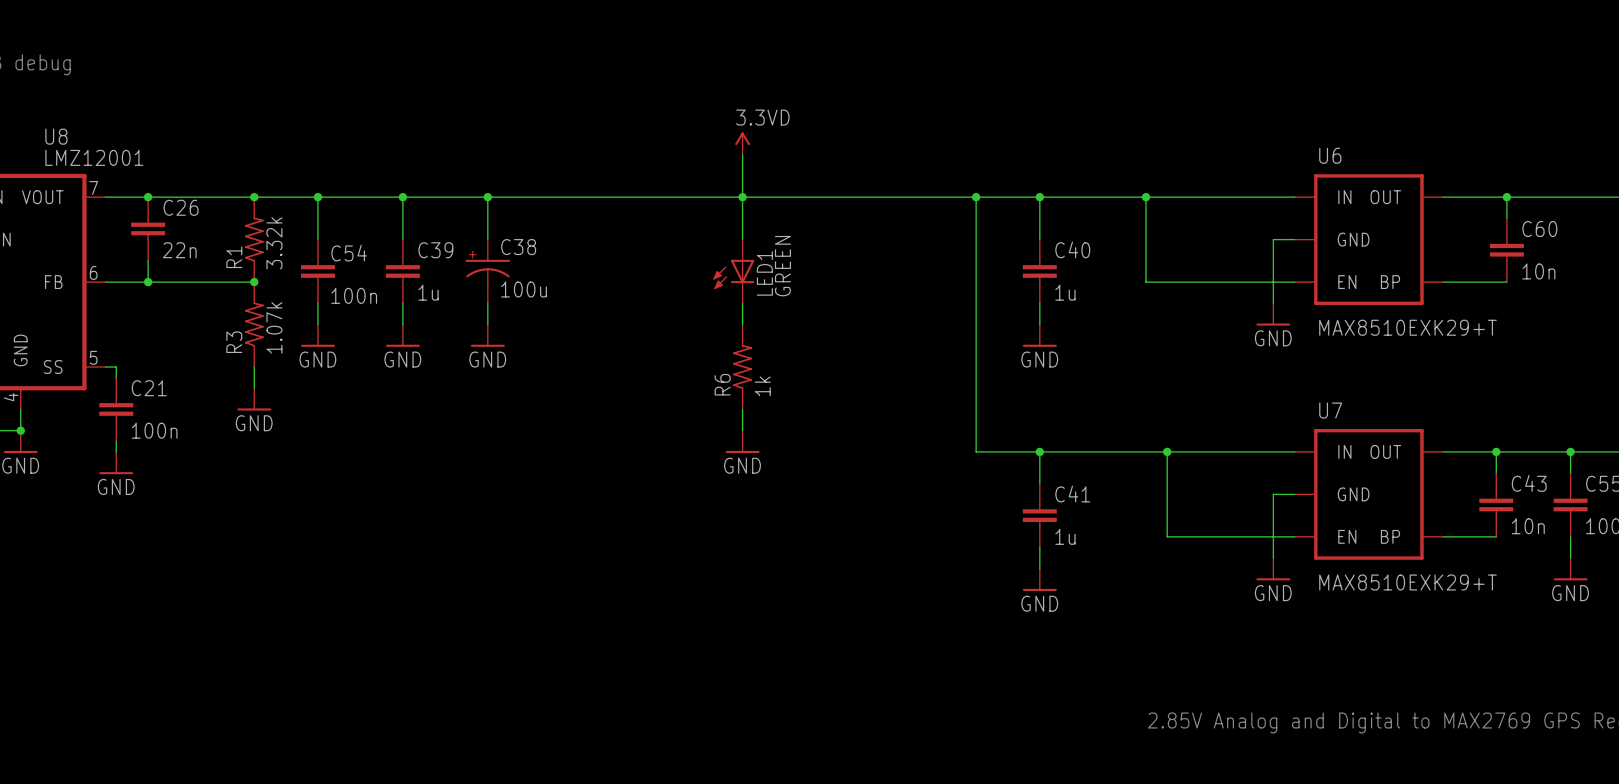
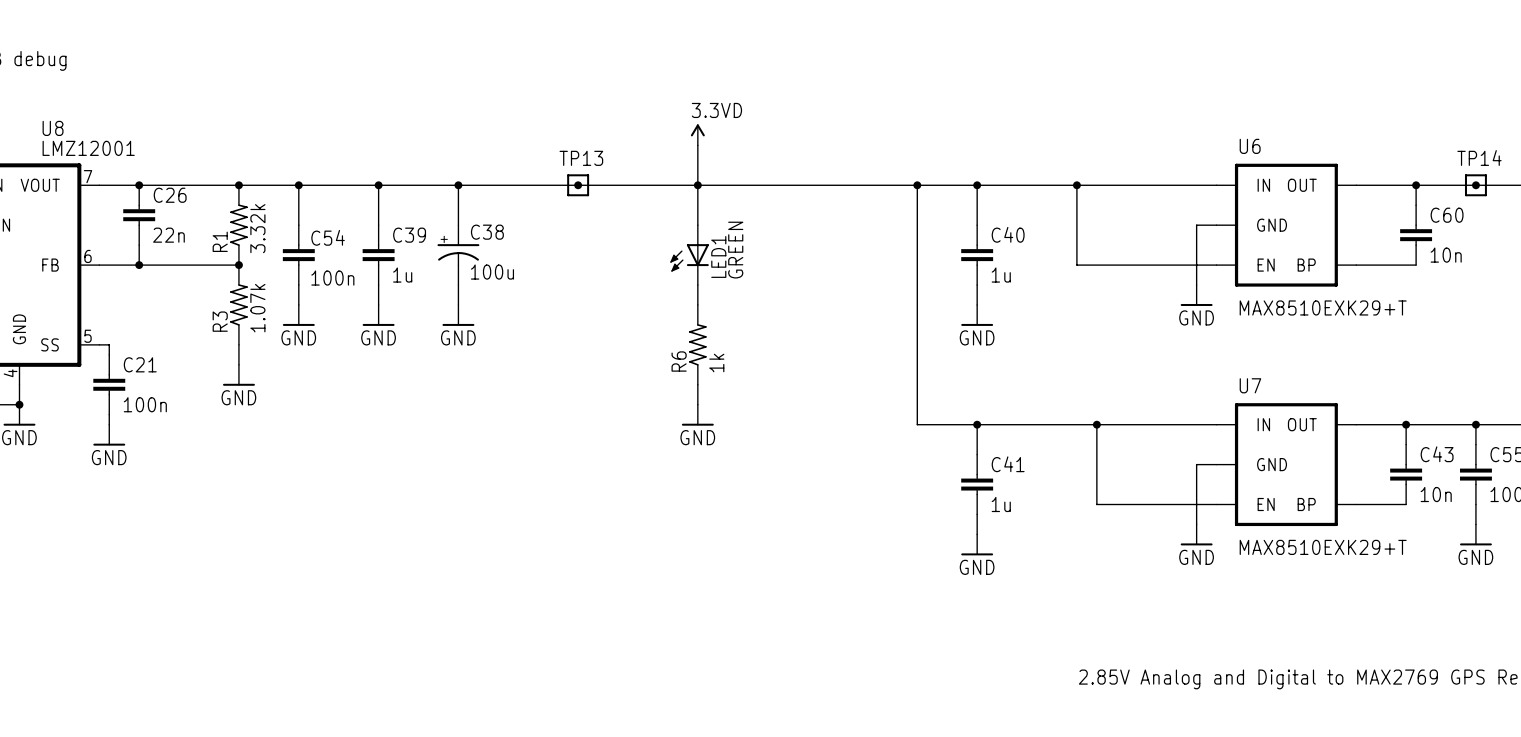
TP13: none -> (578, 185)
junction: none -> (578, 185)
TP14: none -> (1475, 185)
junction: none -> (1475, 185)

